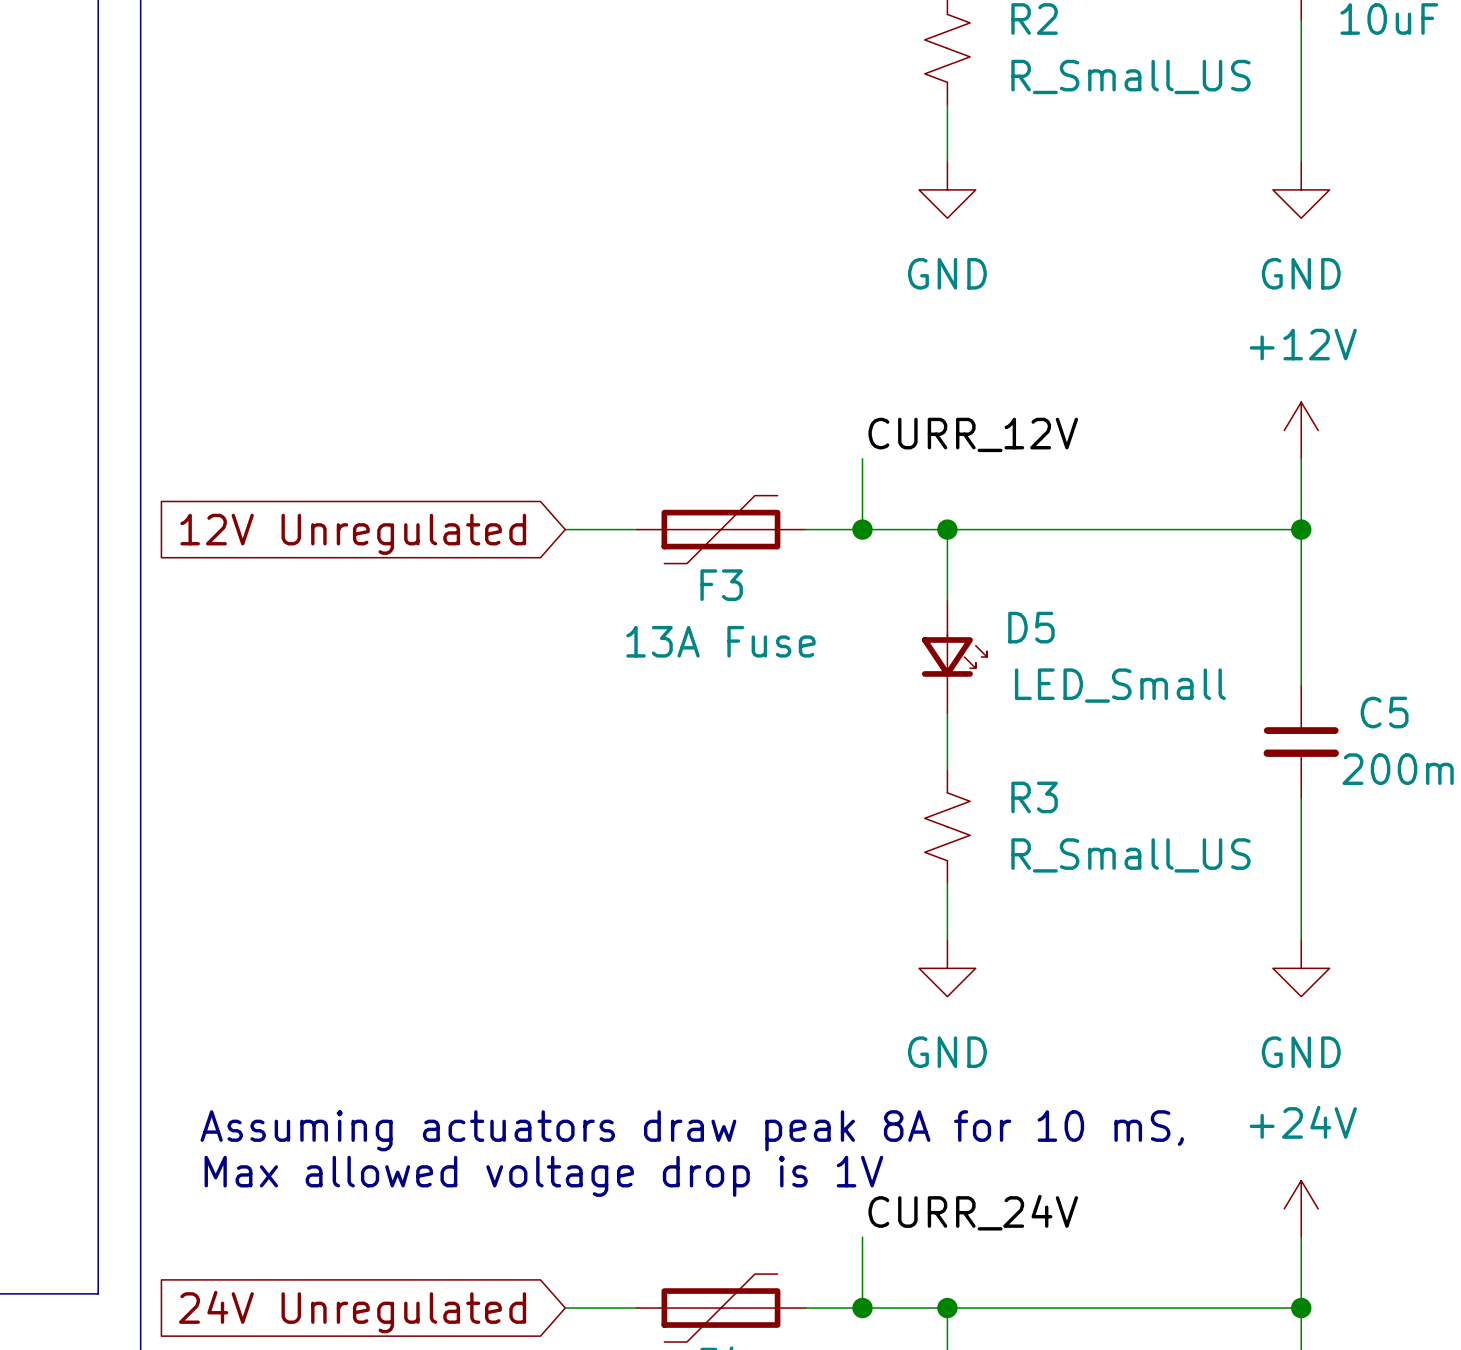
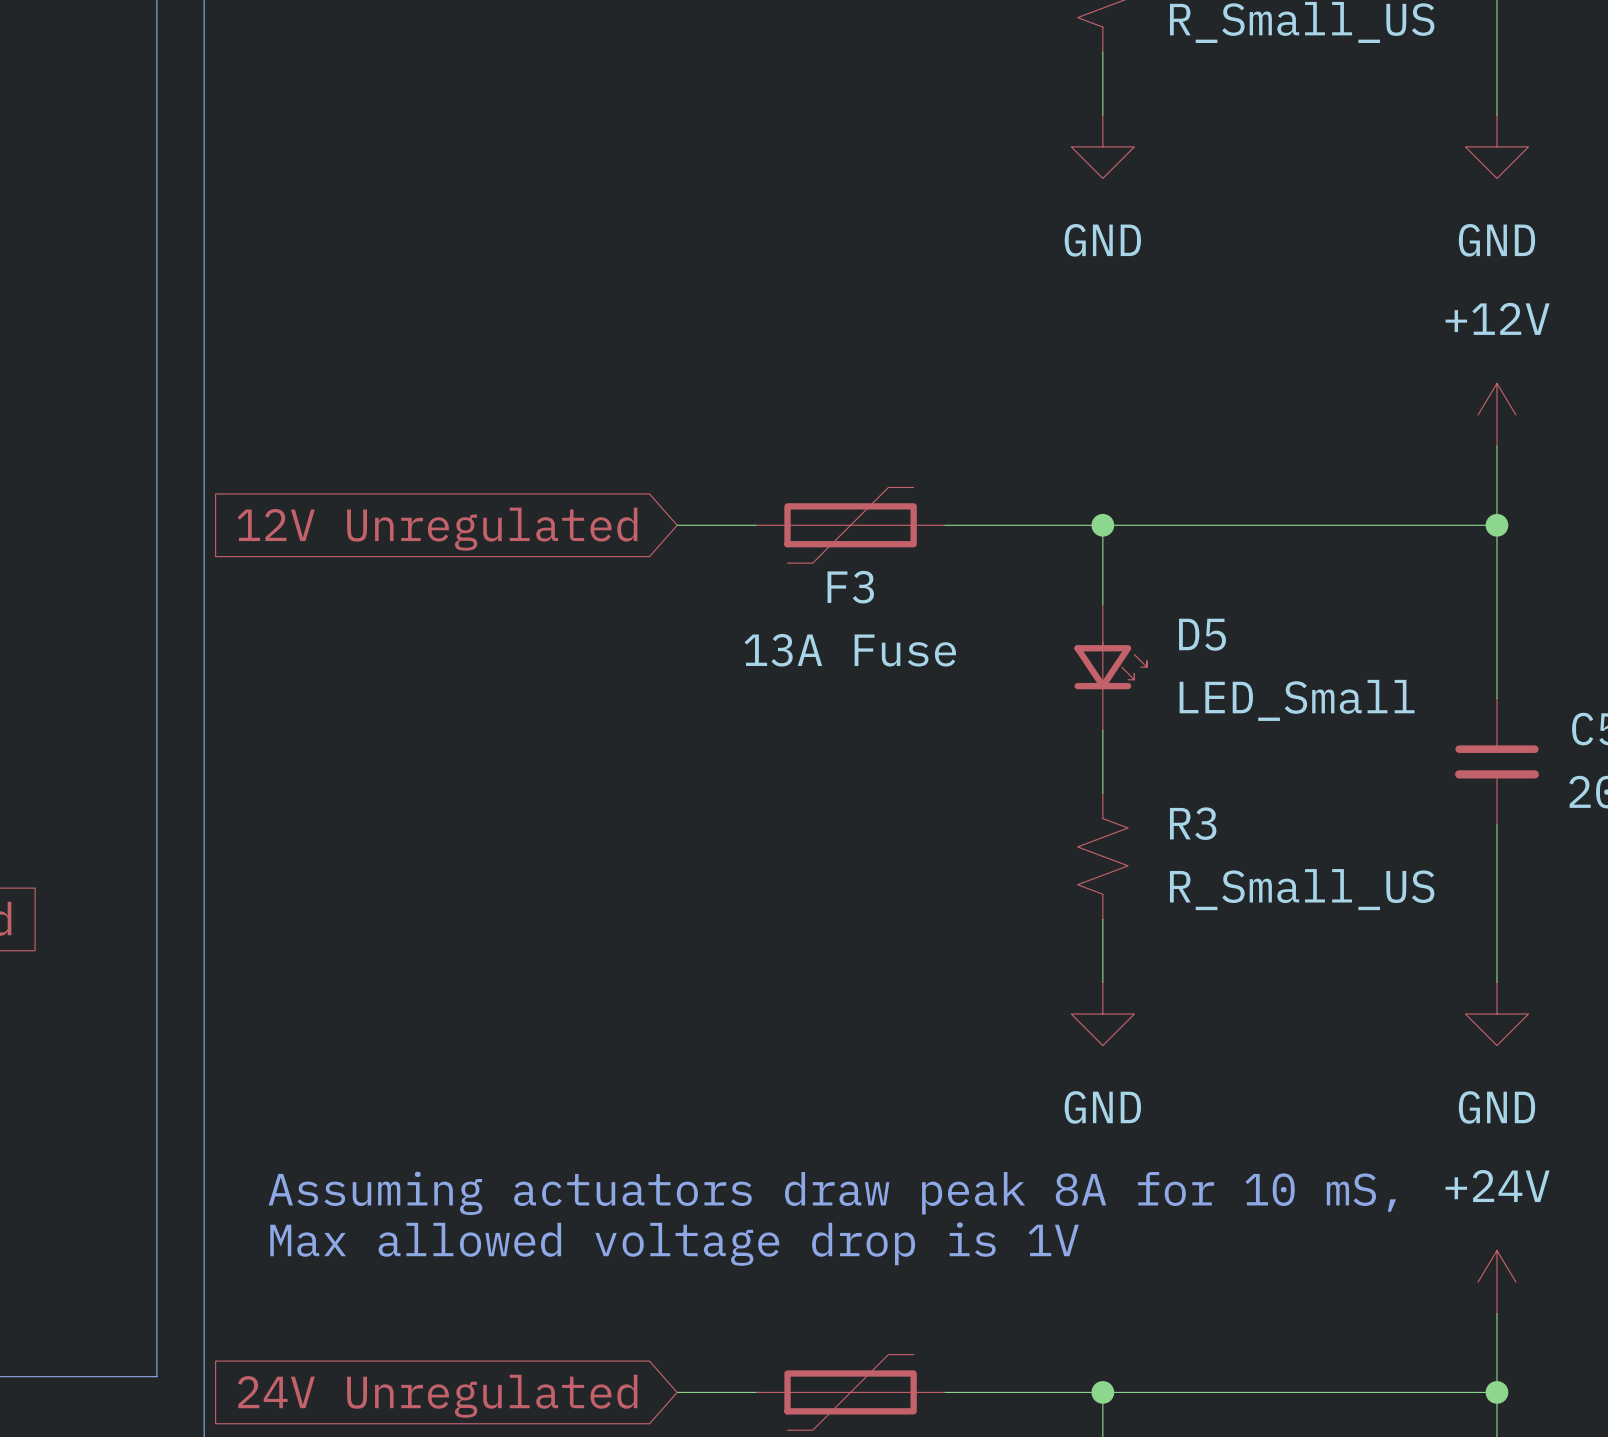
label: CURR_12V (973, 434) -> none
wire: (862, 458) (862, 529) -> none
junction: (862, 529) -> none
label: CURR_24V (973, 1212) -> none
wire: (862, 1237) (862, 1308) -> none
junction: (862, 1308) -> none

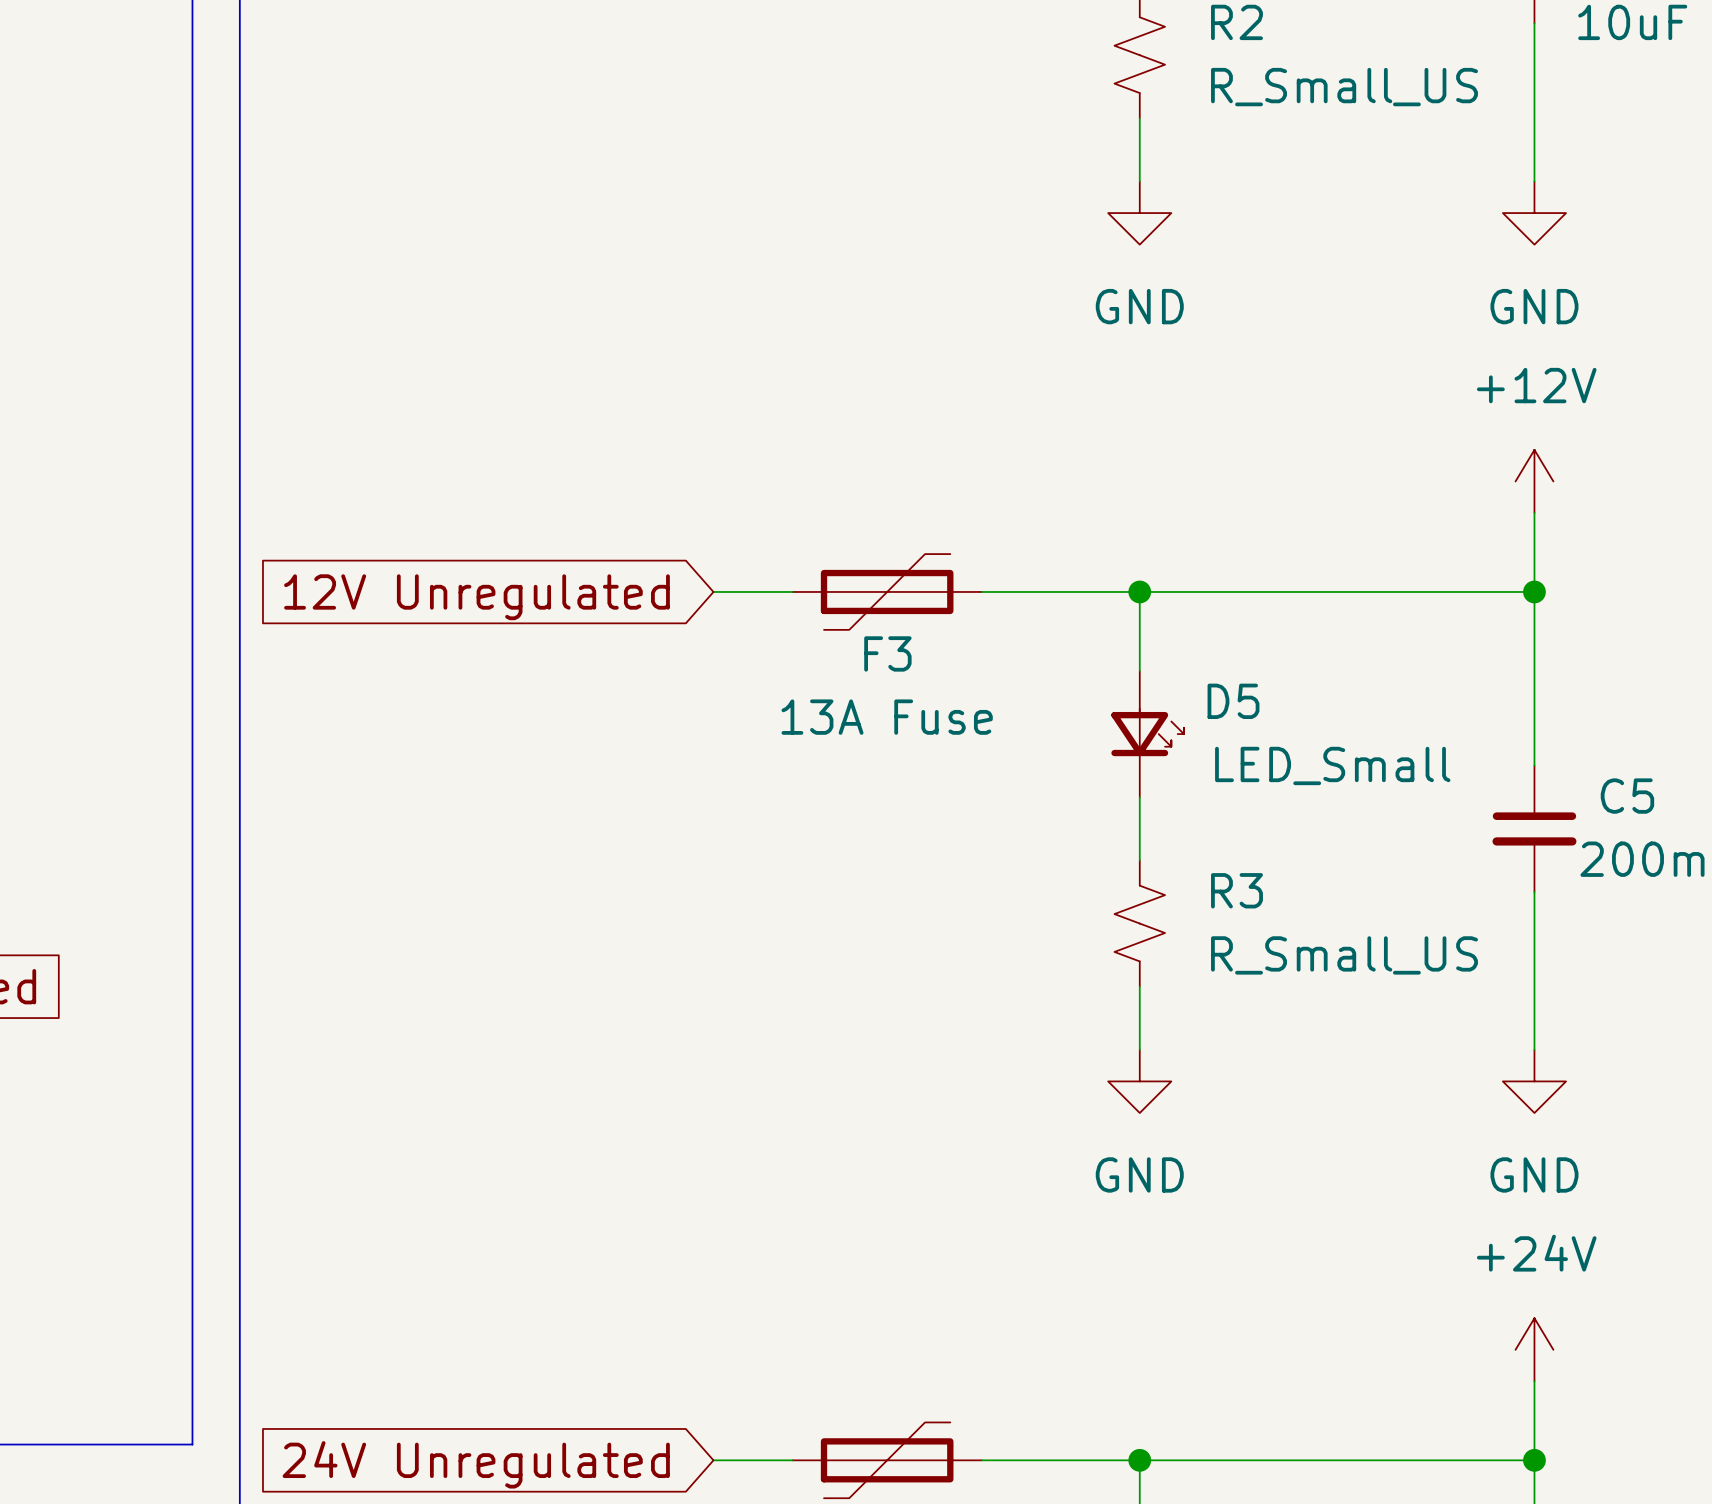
text: Assuming actuators draw peak 8A for 10 mS, (832, 1193) -> none
text: Max allowed voltage drop is 1V (674, 1244) -> none

